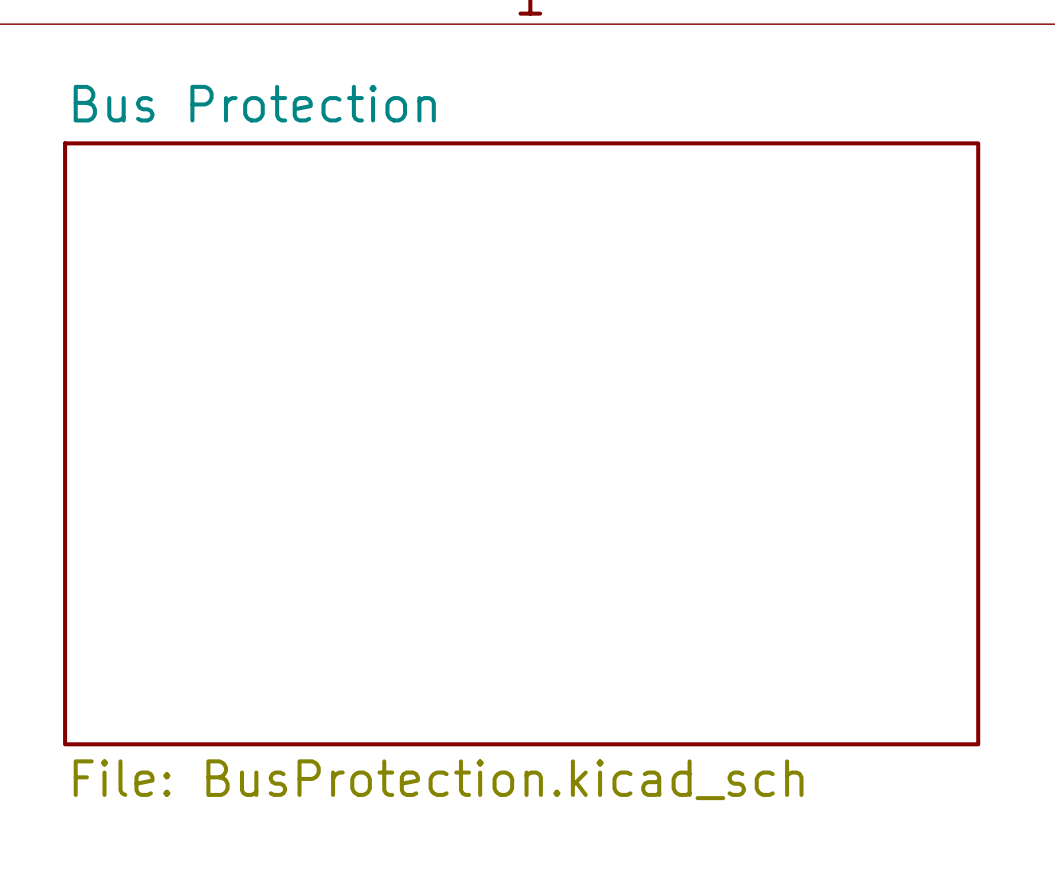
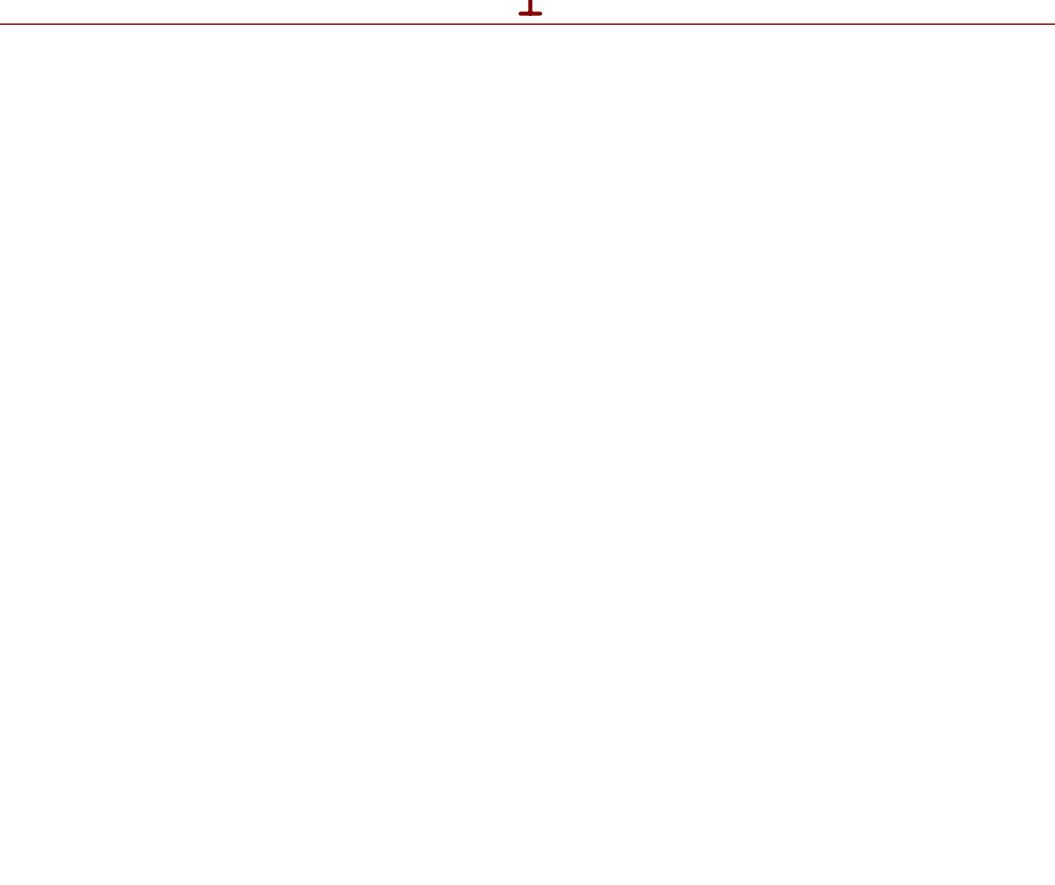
sheet Bus Protection: File: BusProtection.kicad_sch (521, 443) -> none

